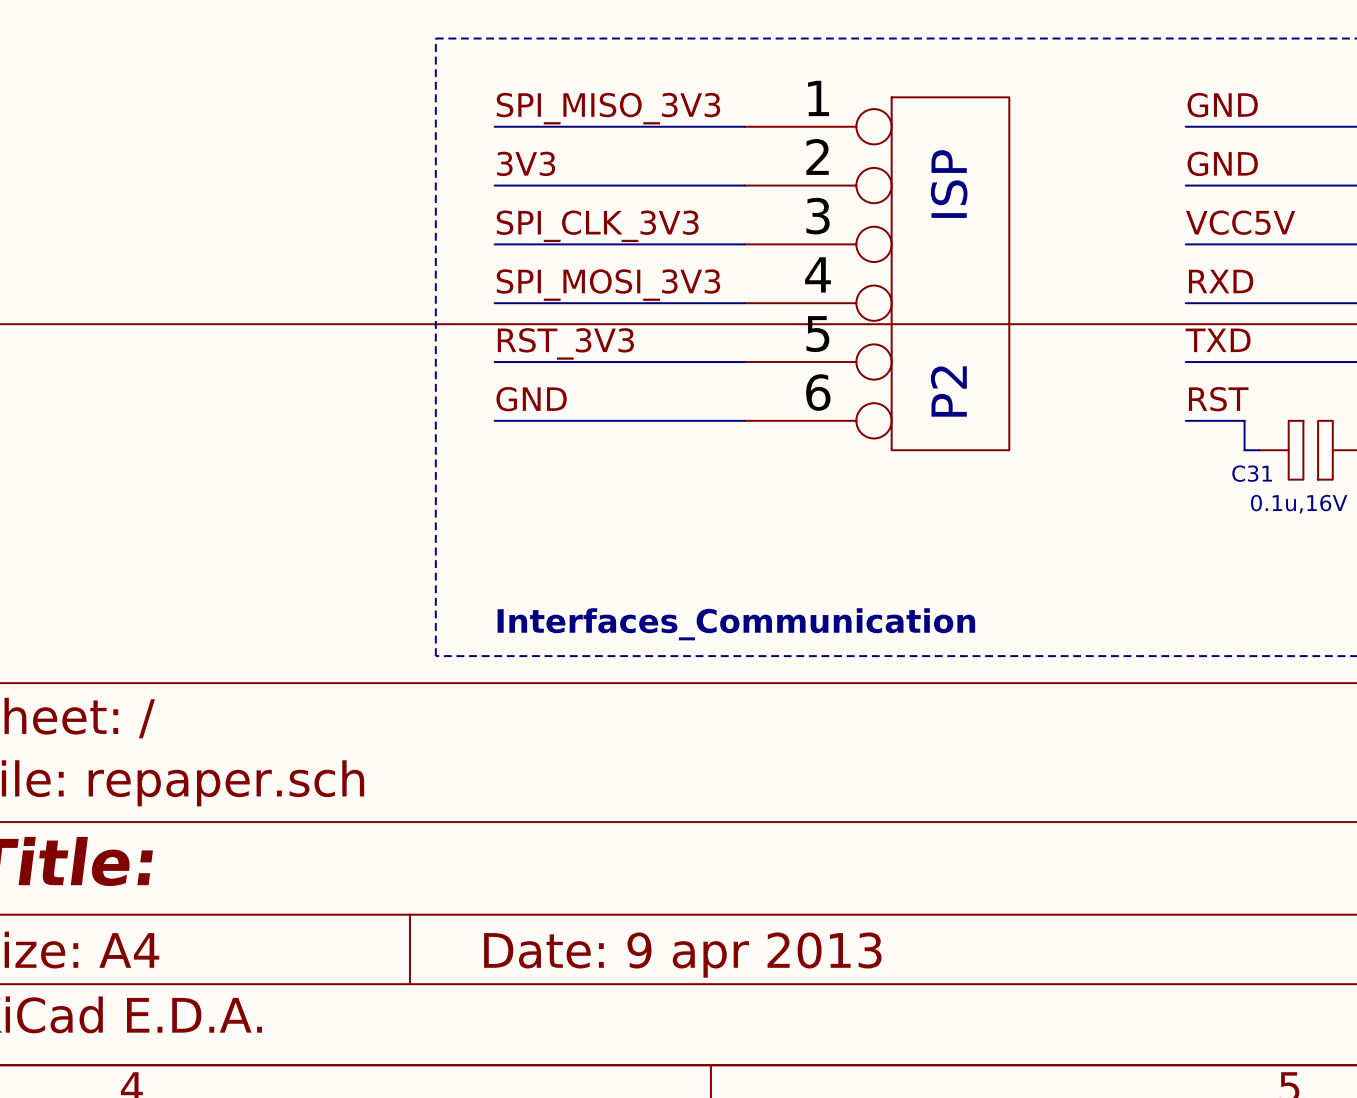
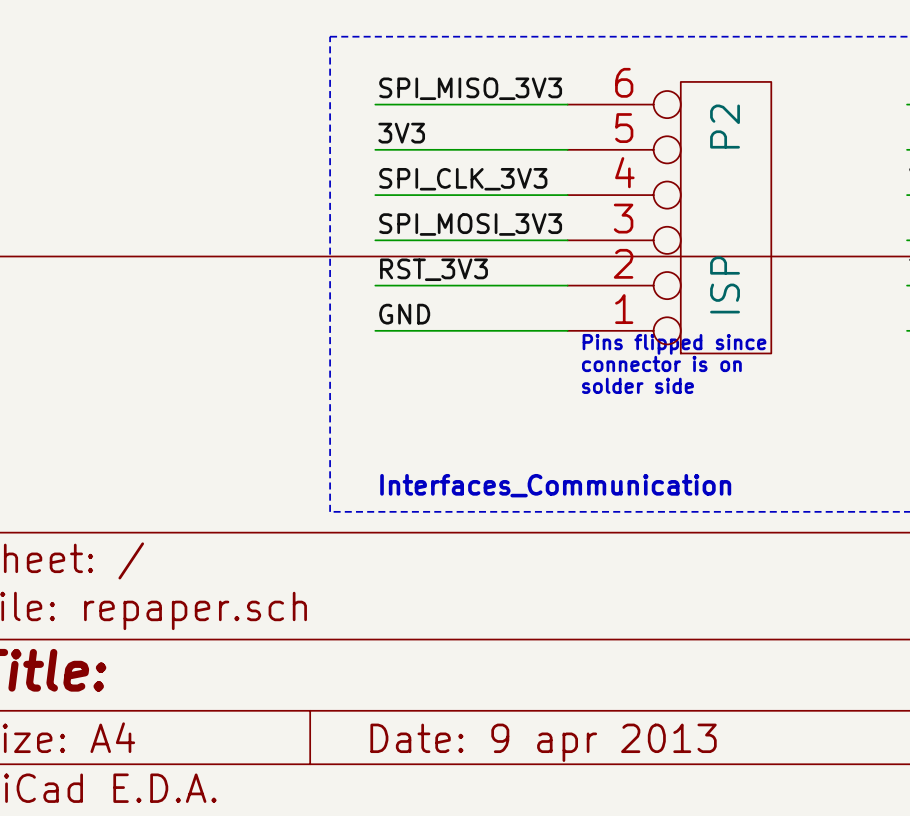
P2 flip: as is (950, 273) -> up-down (726, 217)
text: none -> Pins flipped since (674, 344)
text: none -> connector is on (661, 363)
text: none -> solder side (637, 385)

